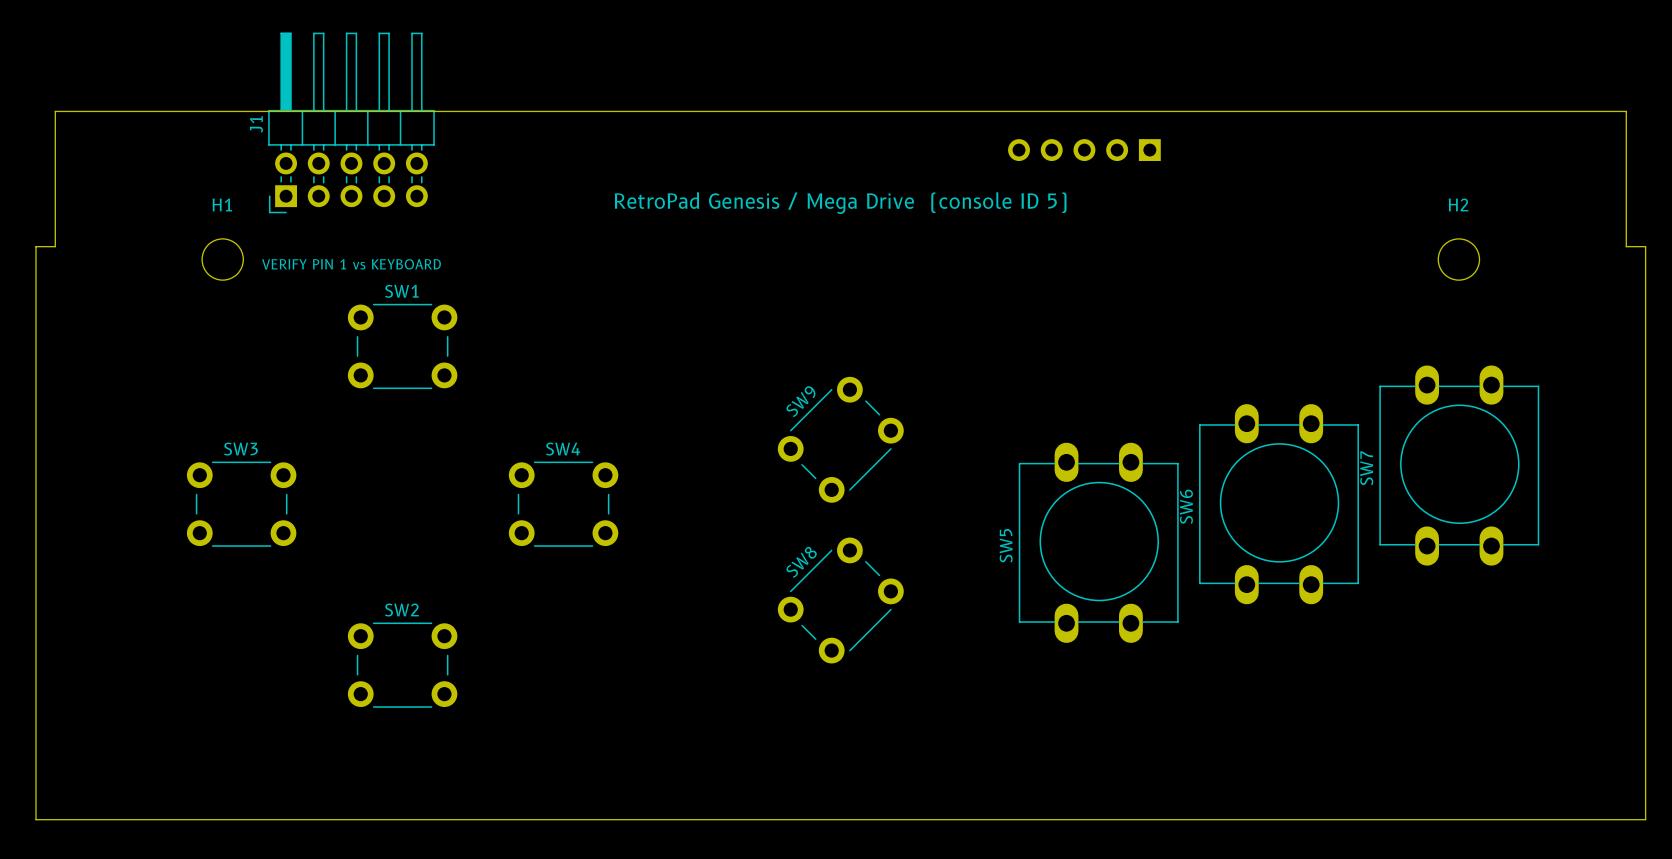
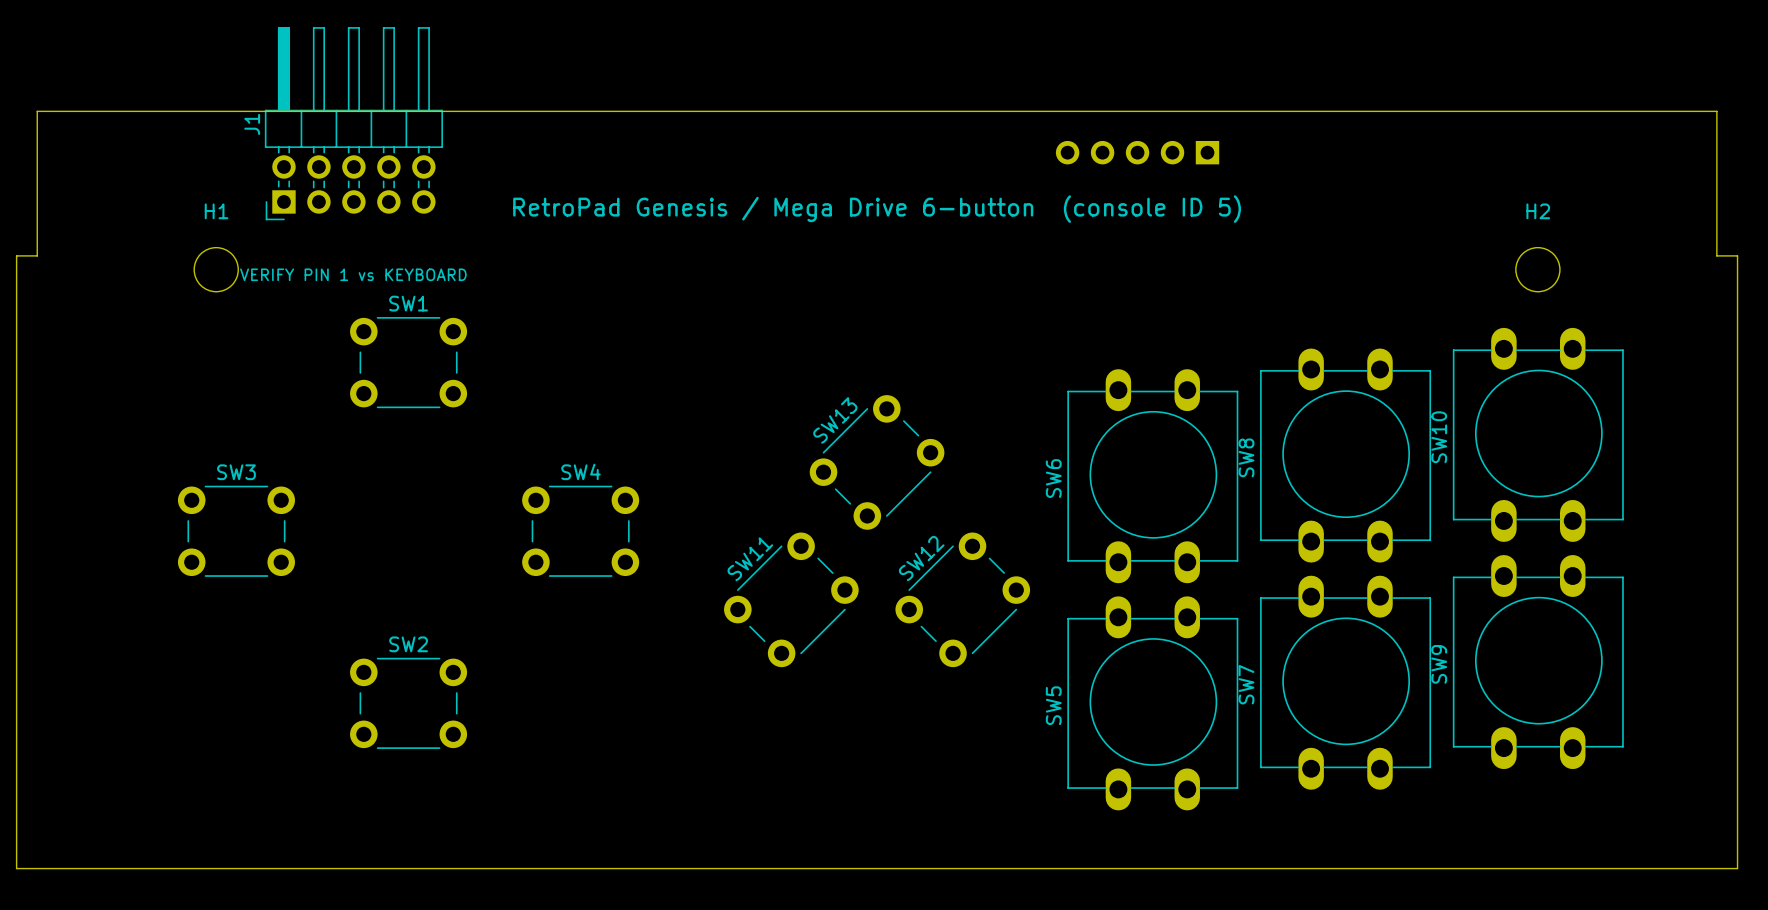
text: RetroPad Genesis / Mega Drive (console ID 5) (840, 203) -> RetroPad Genesis / Mega Drive 6-button (console ID 5) (877, 209)
SW9 name: SW9 (800, 401) -> SW13 (835, 420)
SW10: none -> (1538, 434)
SW7 position: (1459, 465) -> (1345, 682)
SW6 position: (1279, 504) -> (1152, 476)
SW8 footprint: [777, 537, 904, 664] -> [1260, 348, 1432, 563]
SW5 position: (1098, 542) -> (1152, 703)
SW8 name position: SW8 (801, 562) -> SW8 (1246, 457)
SW11: none -> (791, 599)
SW12: none -> (962, 599)
SW9: none -> (1538, 662)

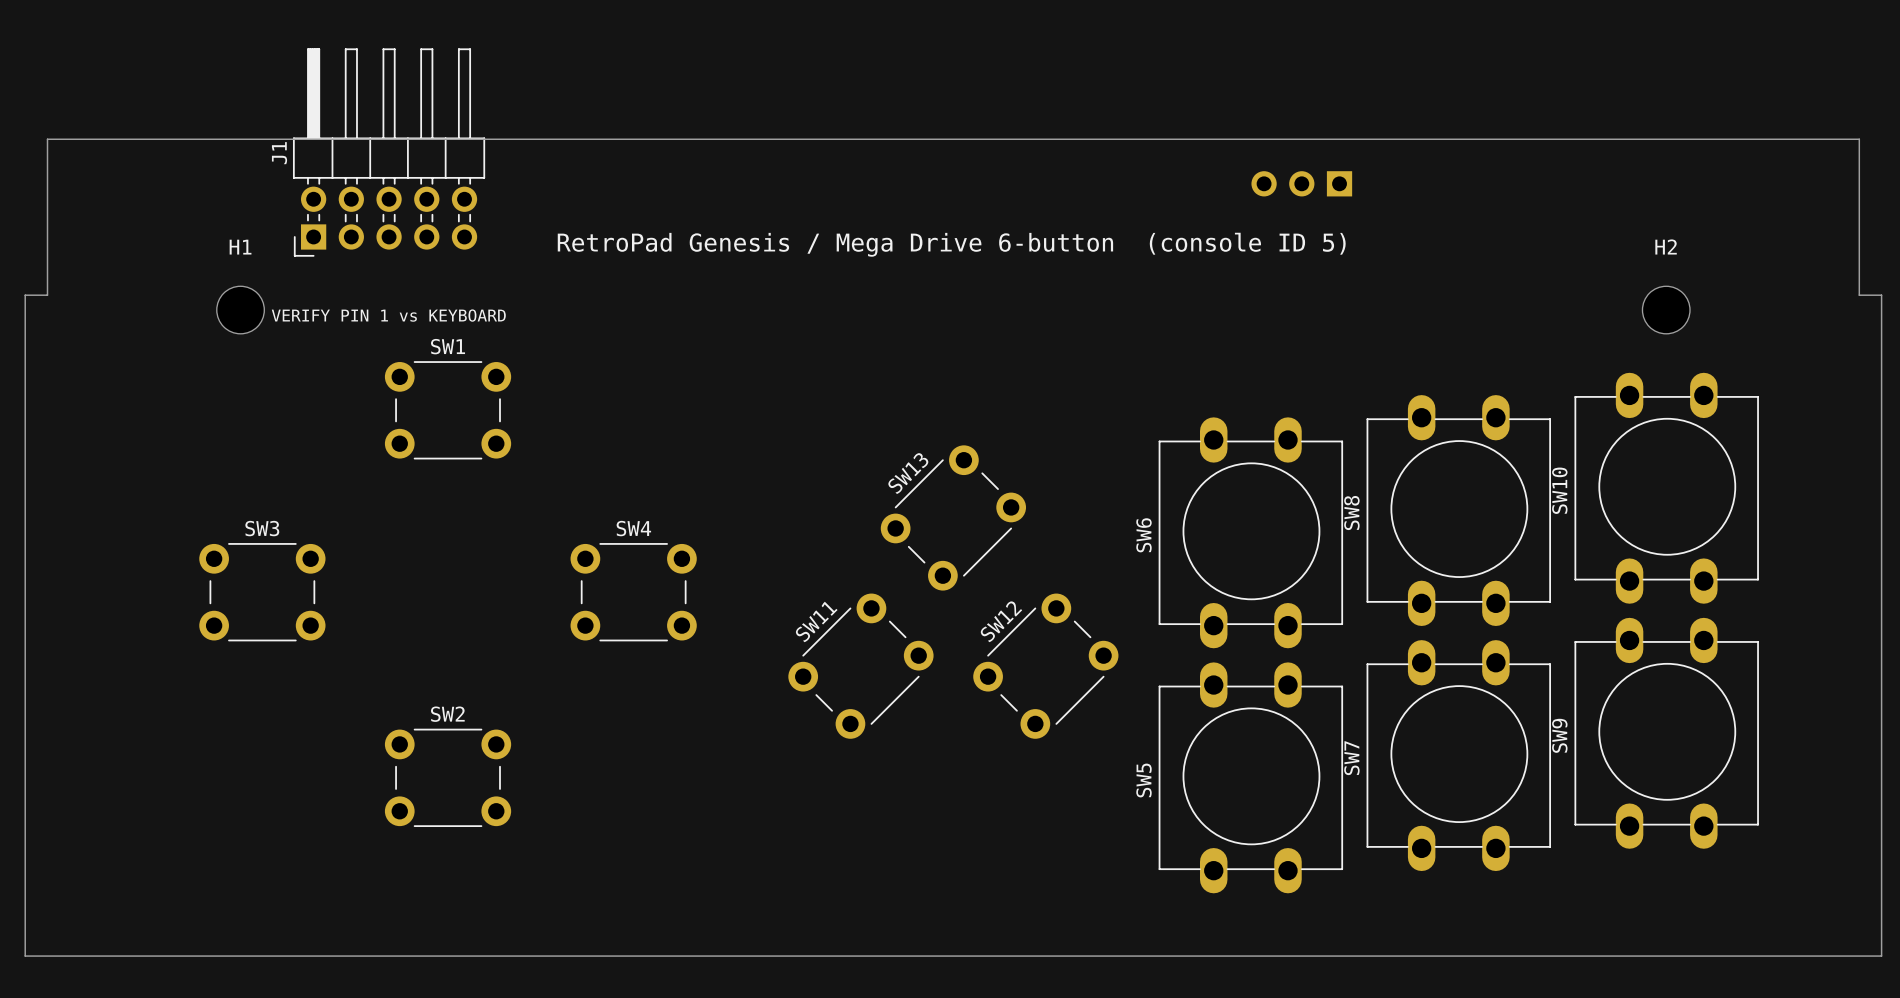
part: (1137, 152) -> none
part: none -> (1301, 183)

